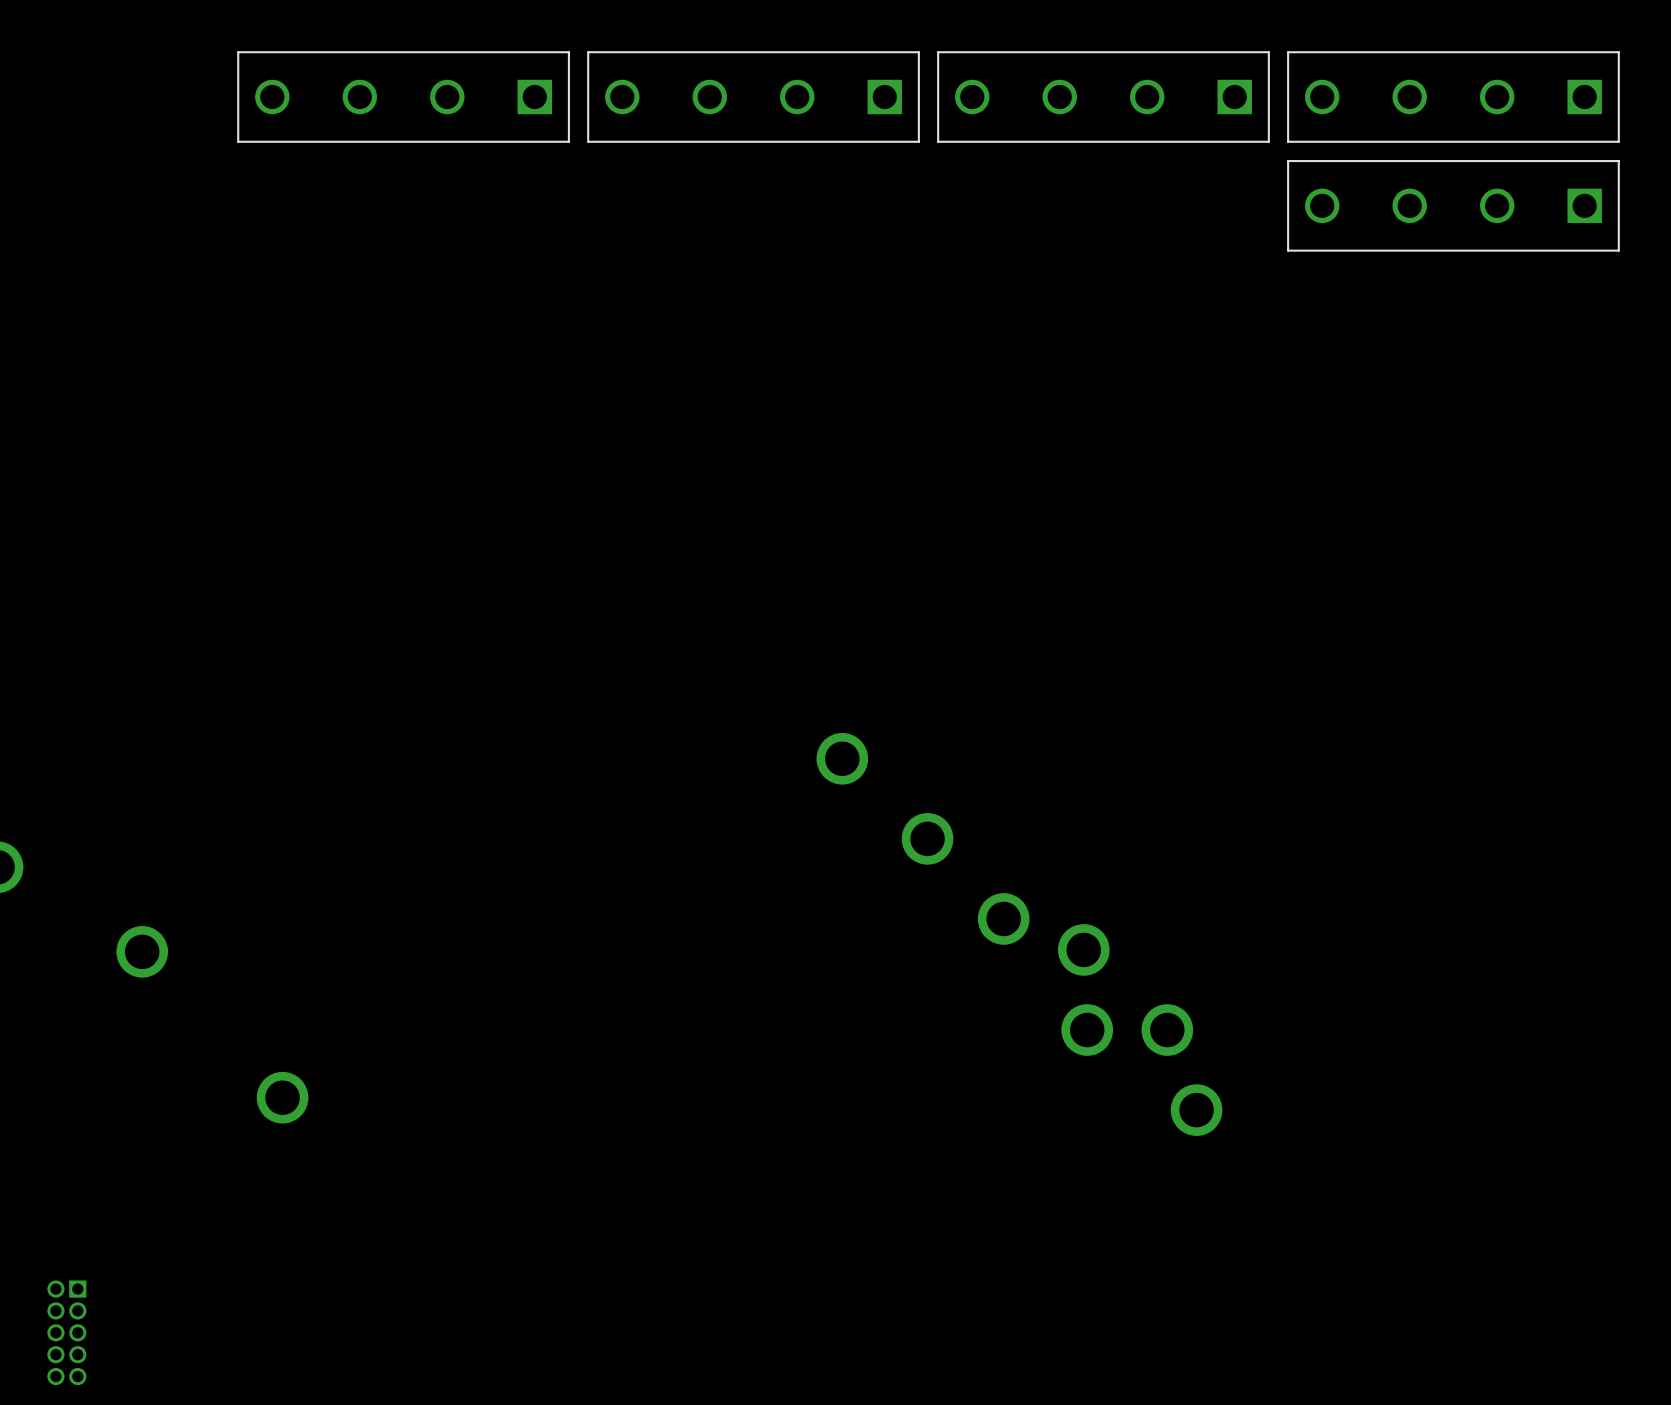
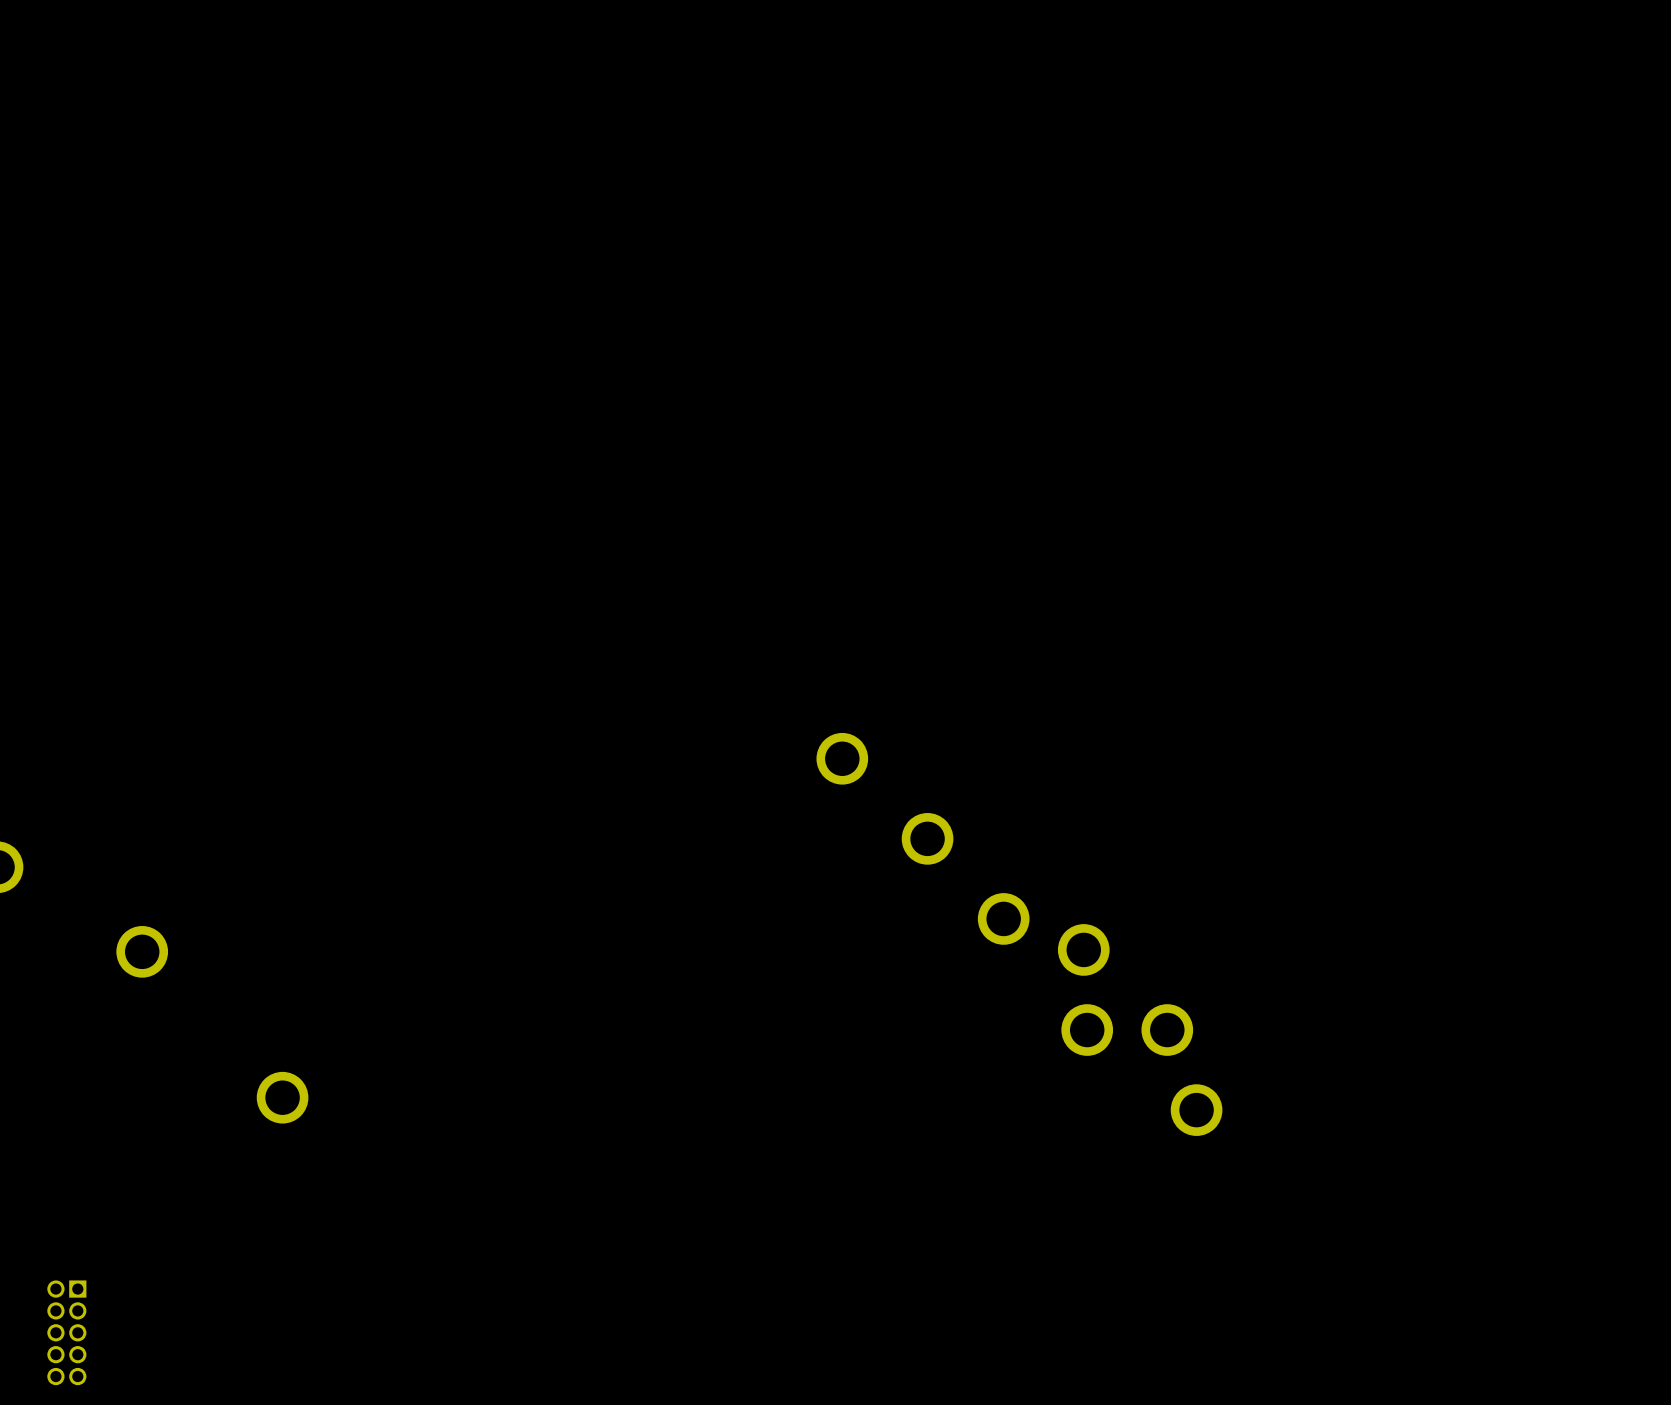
part: (403, 97) -> none
part: (753, 97) -> none
part: (1103, 97) -> none
part: (1453, 97) -> none
part: (1453, 205) -> none

